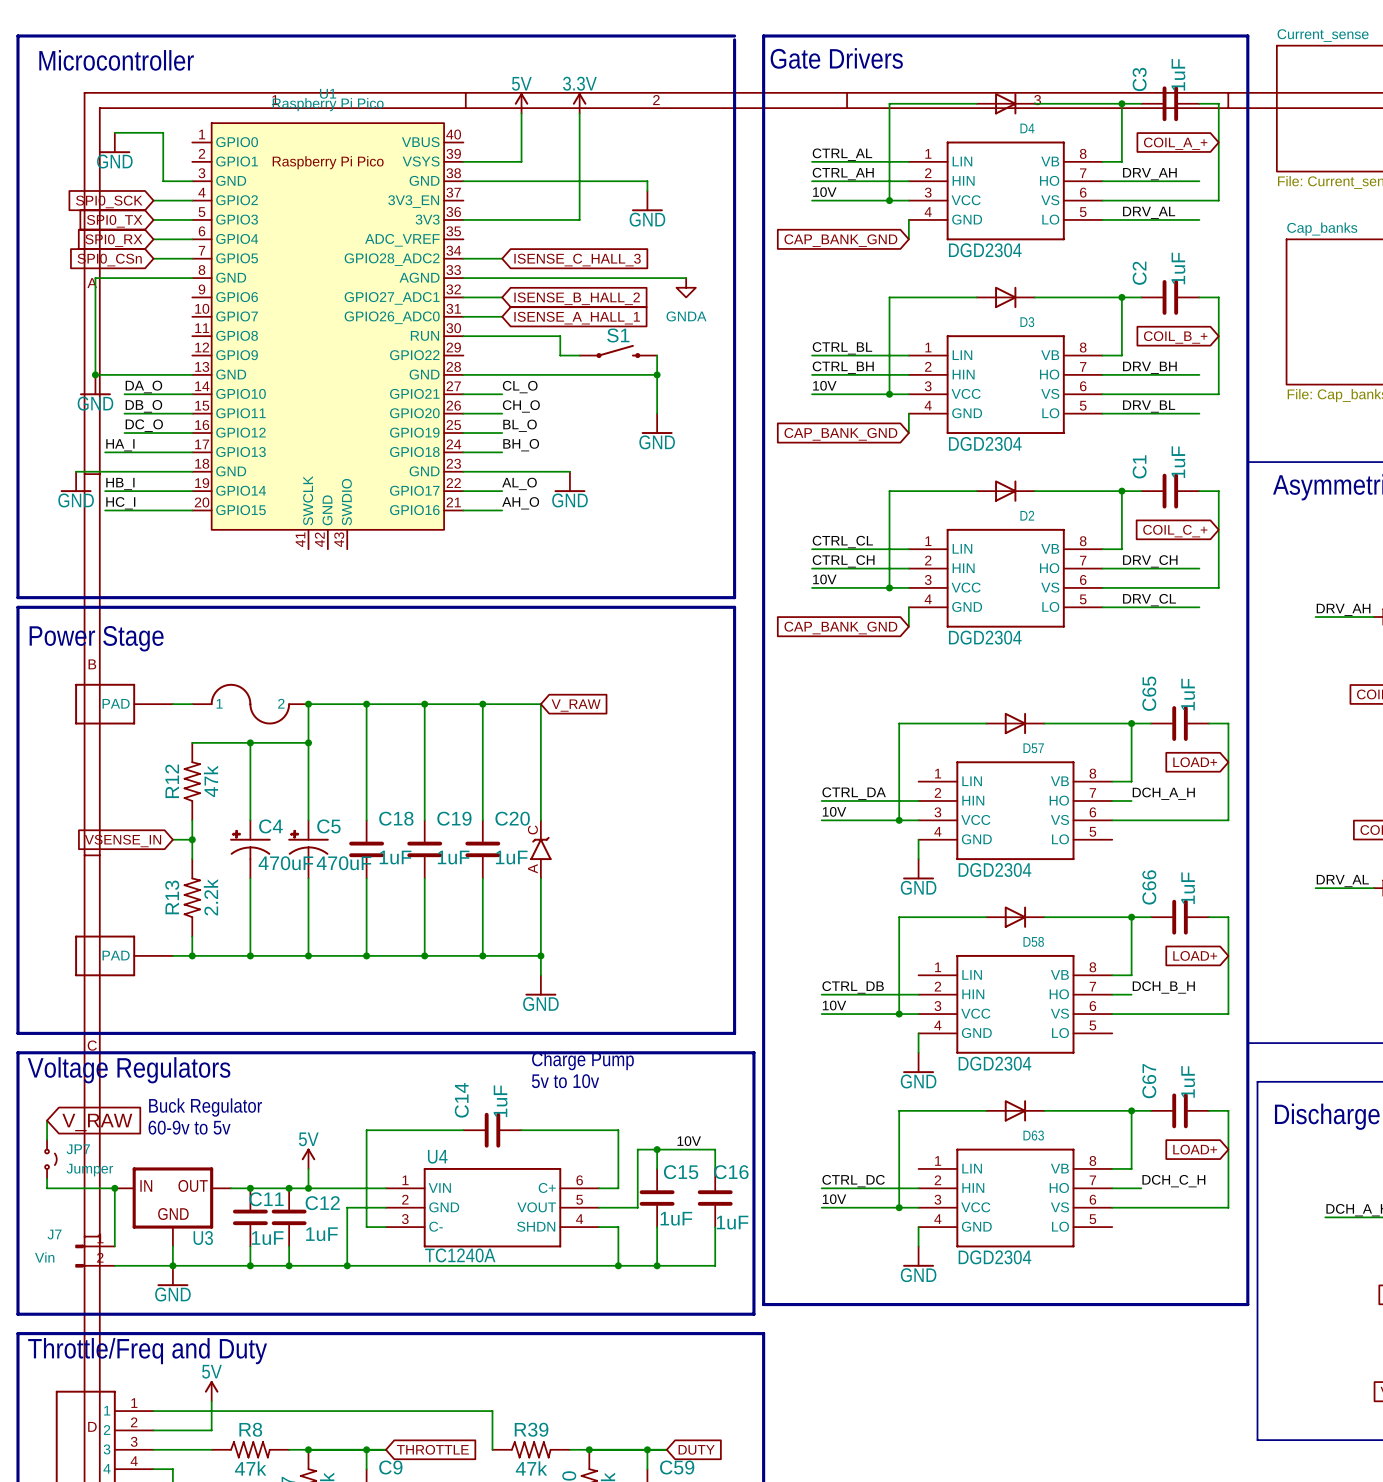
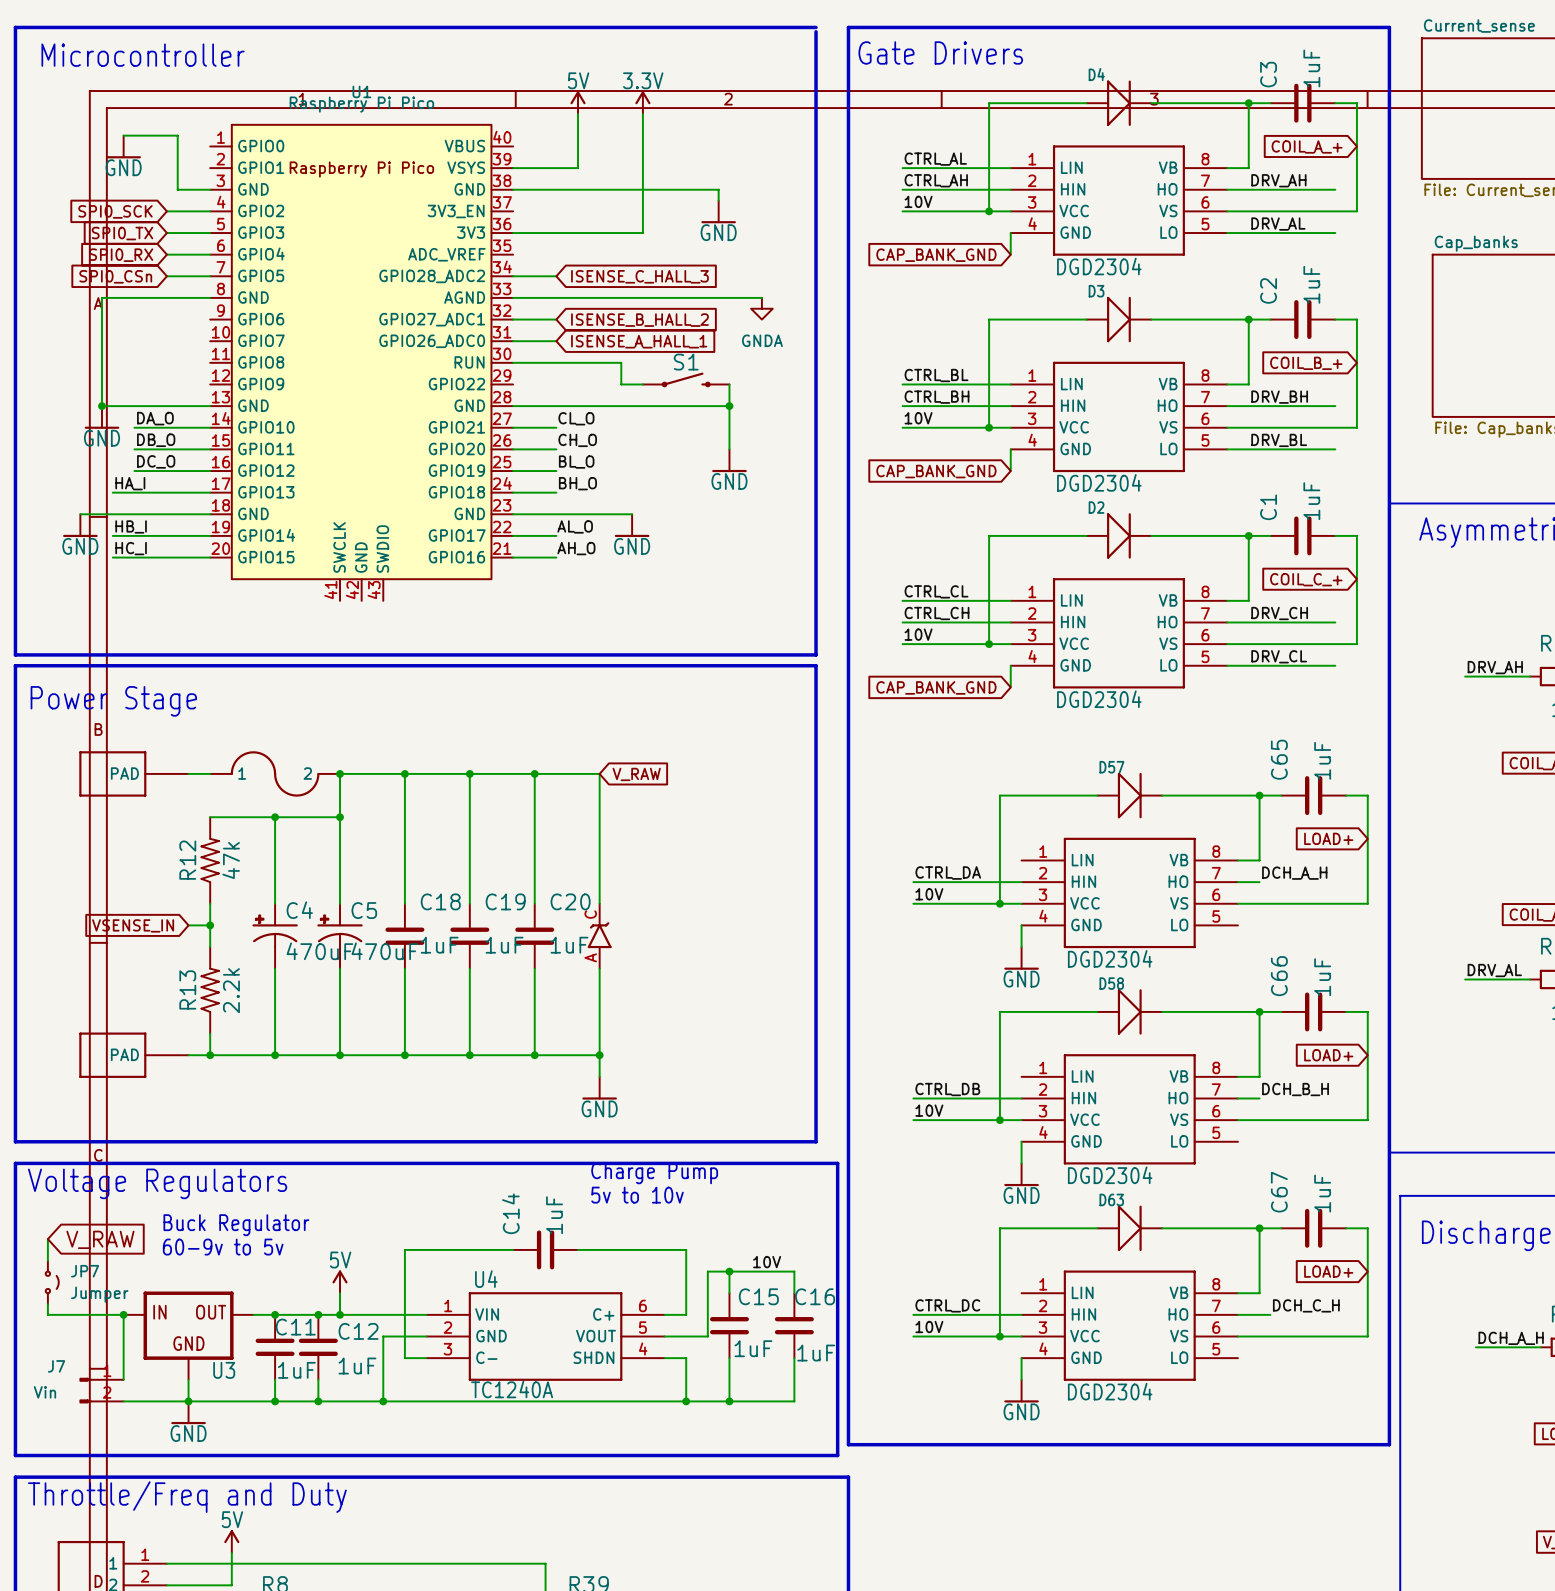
D4 symbol: [976, 93, 1035, 115] -> [1086, 80, 1152, 126]
D4 name position: D4 (1027, 128) -> D4 (1096, 74)
D3 symbol: [976, 286, 1035, 309] -> [1086, 296, 1152, 343]
D3 name position: D3 (1027, 322) -> D3 (1096, 291)
D2 symbol: [976, 480, 1035, 502] -> [1086, 513, 1152, 559]
D2 name position: D2 (1027, 515) -> D2 (1096, 507)
D57 symbol: [986, 712, 1045, 735] -> [1097, 772, 1163, 819]
D57 name position: D57 (1033, 748) -> D57 (1111, 767)
D58 symbol: [986, 906, 1045, 928] -> [1097, 989, 1163, 1035]
D58 name position: D58 (1033, 941) -> D58 (1111, 983)
D63 symbol: [986, 1100, 1045, 1122] -> [1097, 1205, 1163, 1252]
D63 name position: D63 (1033, 1135) -> D63 (1111, 1199)

